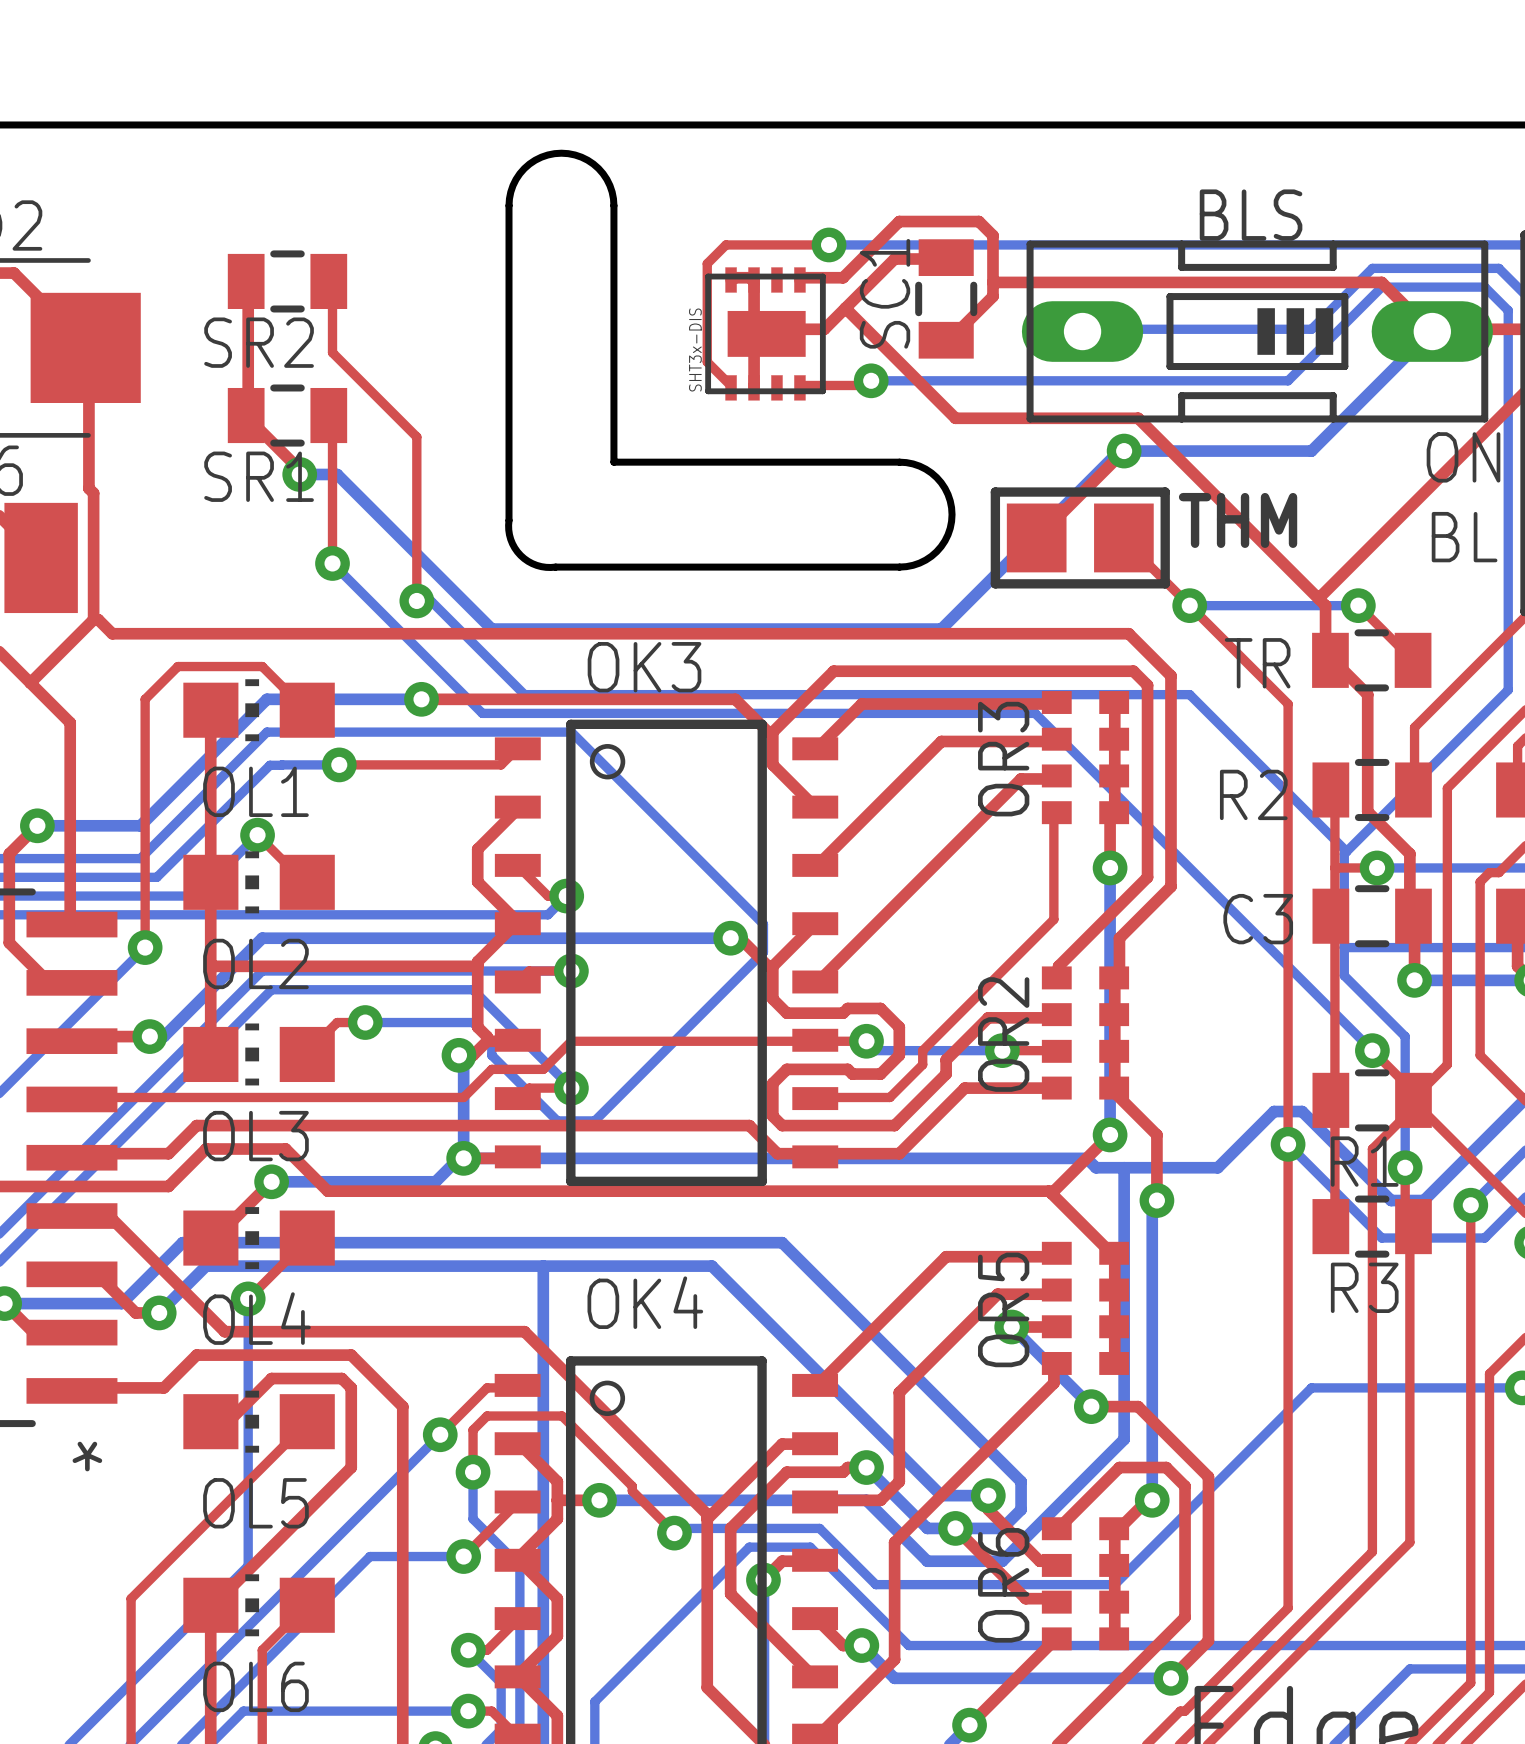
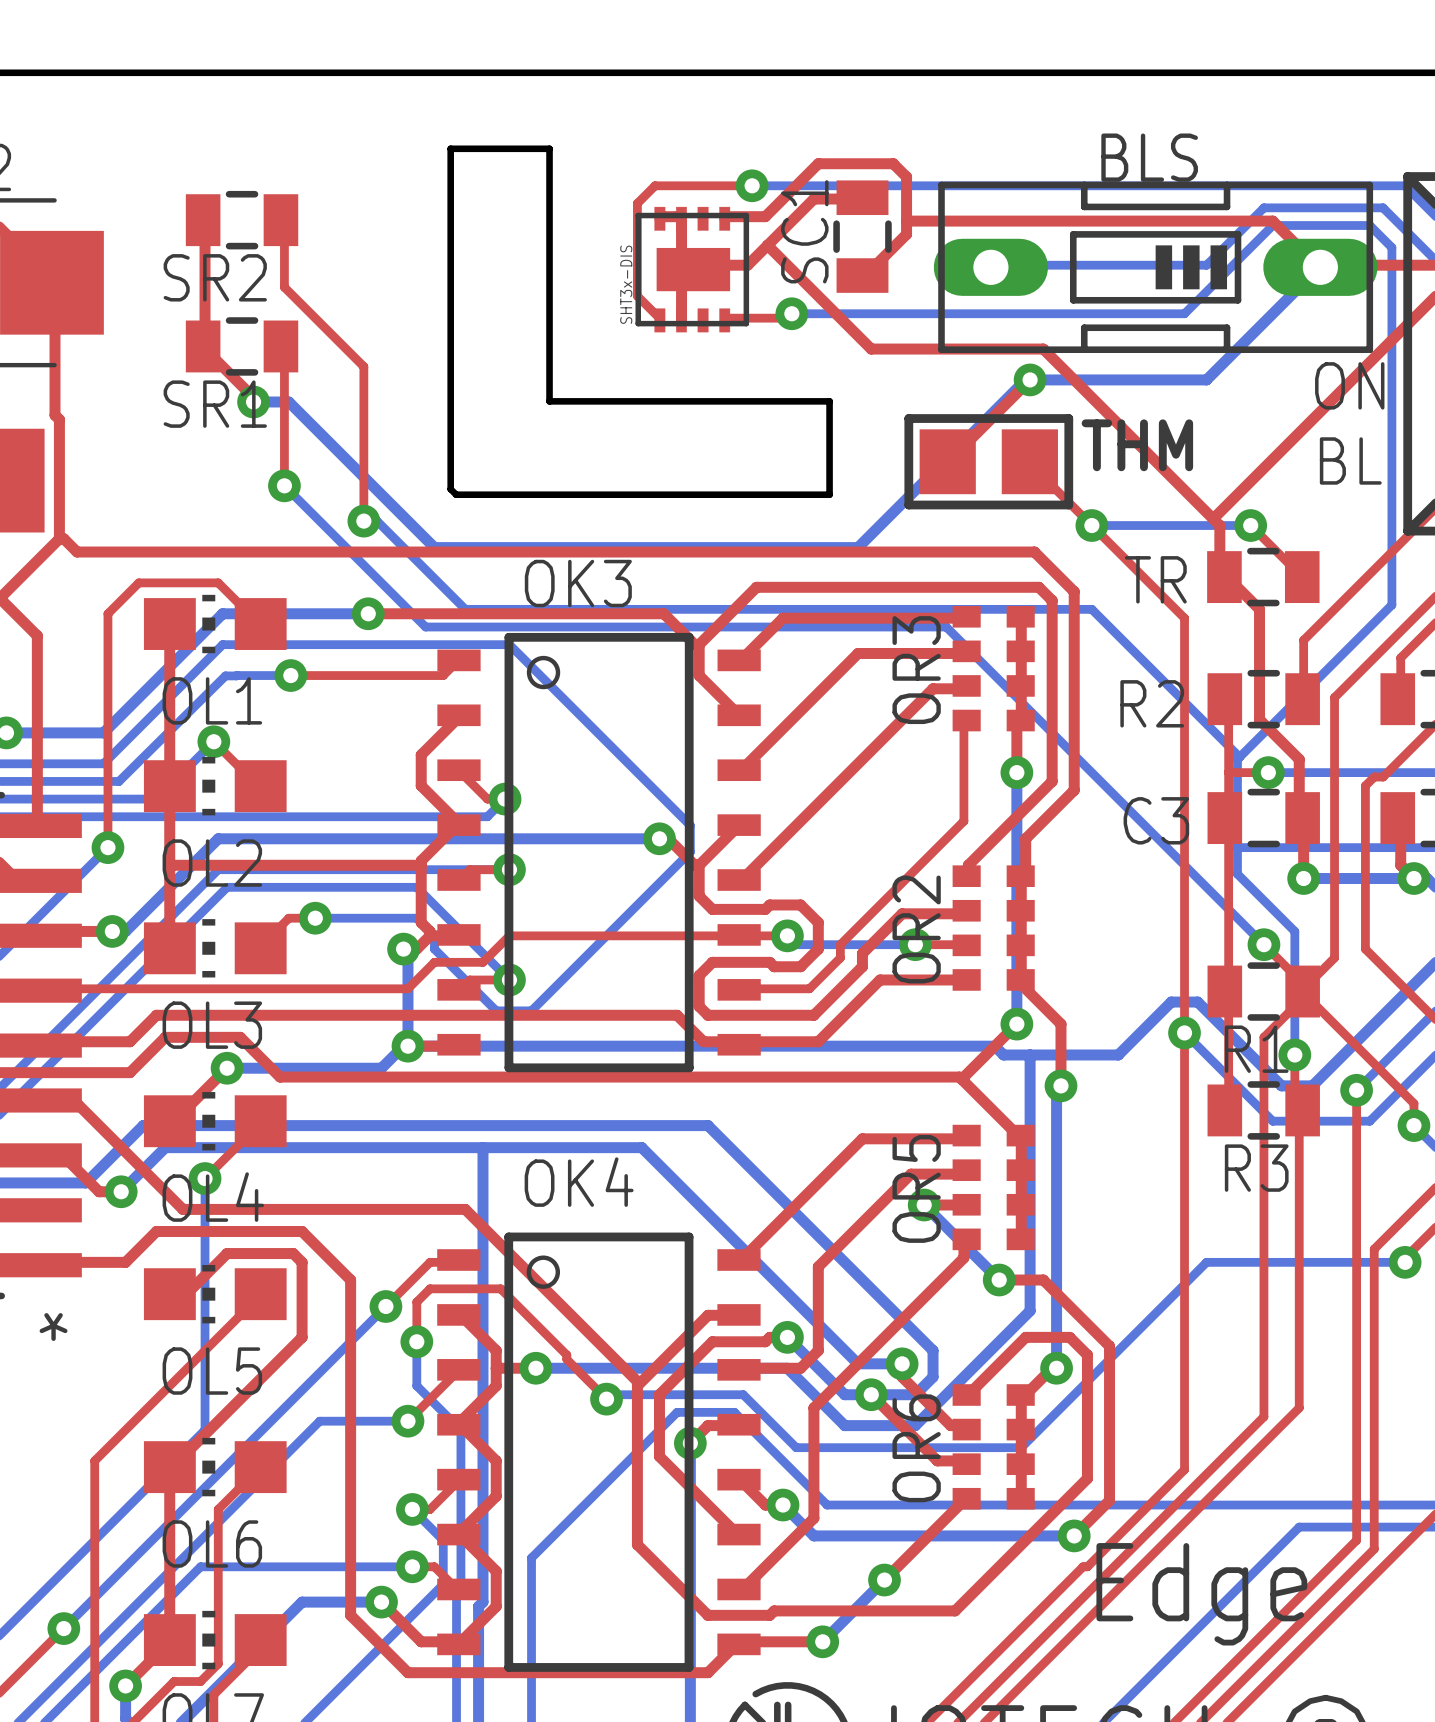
board edge: (509, 205) (513, 185) (524, 168) (541, 157) (561, 153) (581, 157) (598, 168) (609, 185) (613, 205) -> (450, 148) (549, 148)
board edge: (613, 462) (906, 462) (925, 469) (941, 482) (950, 501) (951, 521) (945, 540) (936, 551) (925, 560) (906, 566) (550, 567) (532, 563) (517, 551) (509, 534) (509, 520) -> (549, 390) (549, 401) (829, 401) (829, 494) (456, 494) (450, 489) (450, 445)

